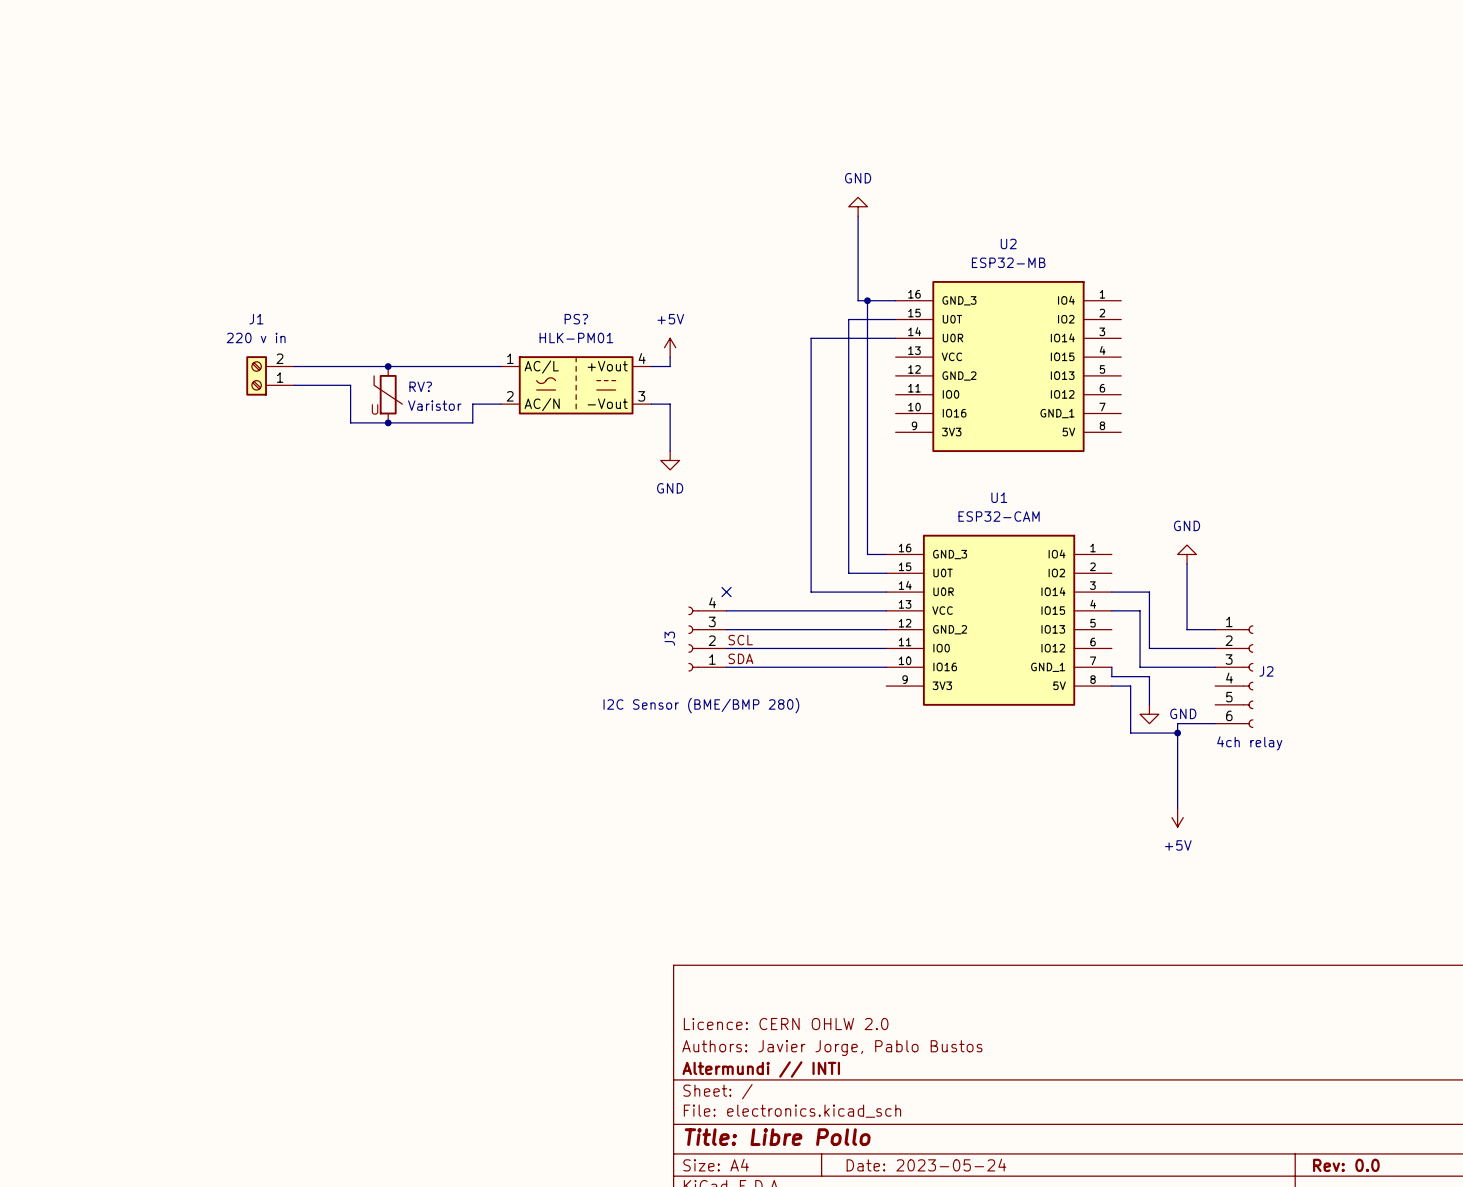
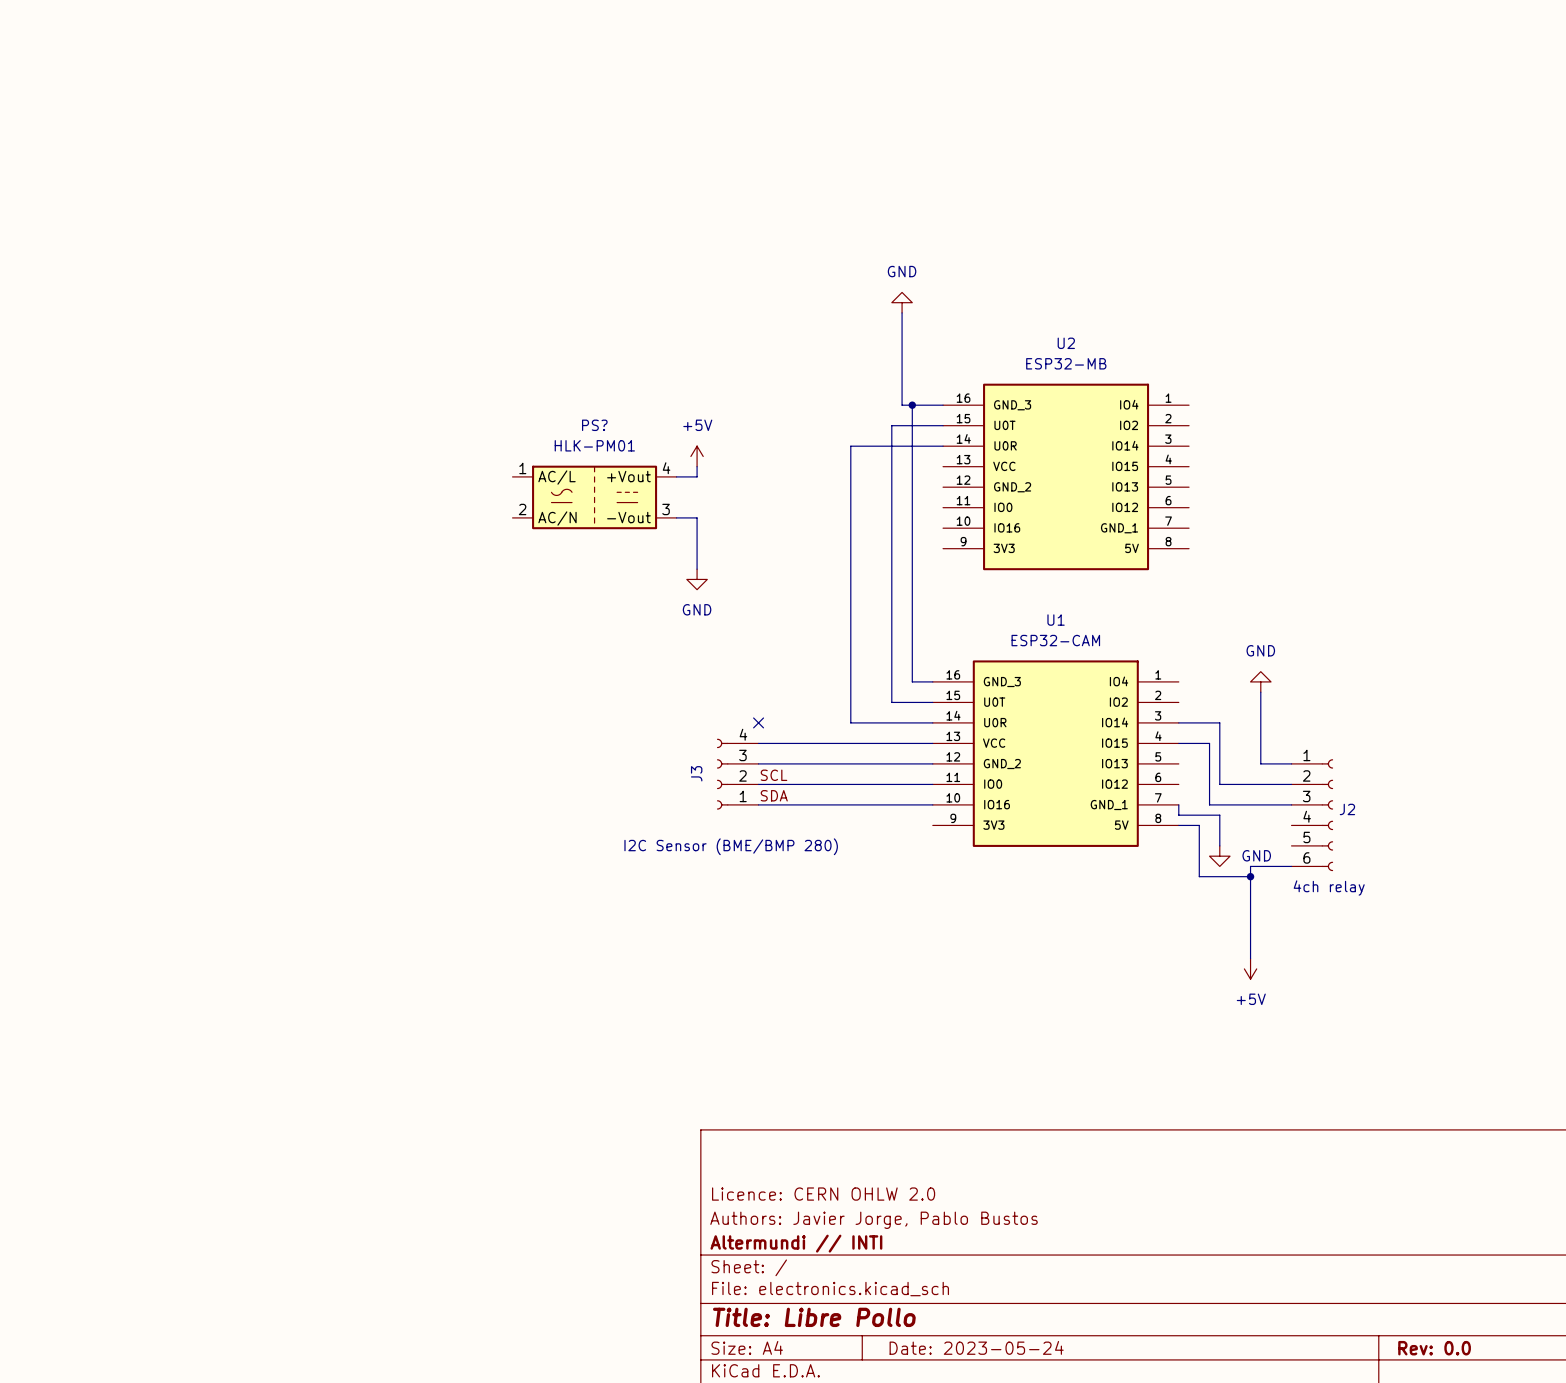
wire: (294, 366) (500, 366) -> none
junction: (388, 366) -> none
J1: 220 v in (270, 375) -> none
wire: (294, 385) (350, 385) (350, 422) (472, 422) (472, 404) (500, 404) -> none
RV?: Varistor (388, 394) -> none
junction: (388, 422) -> none

